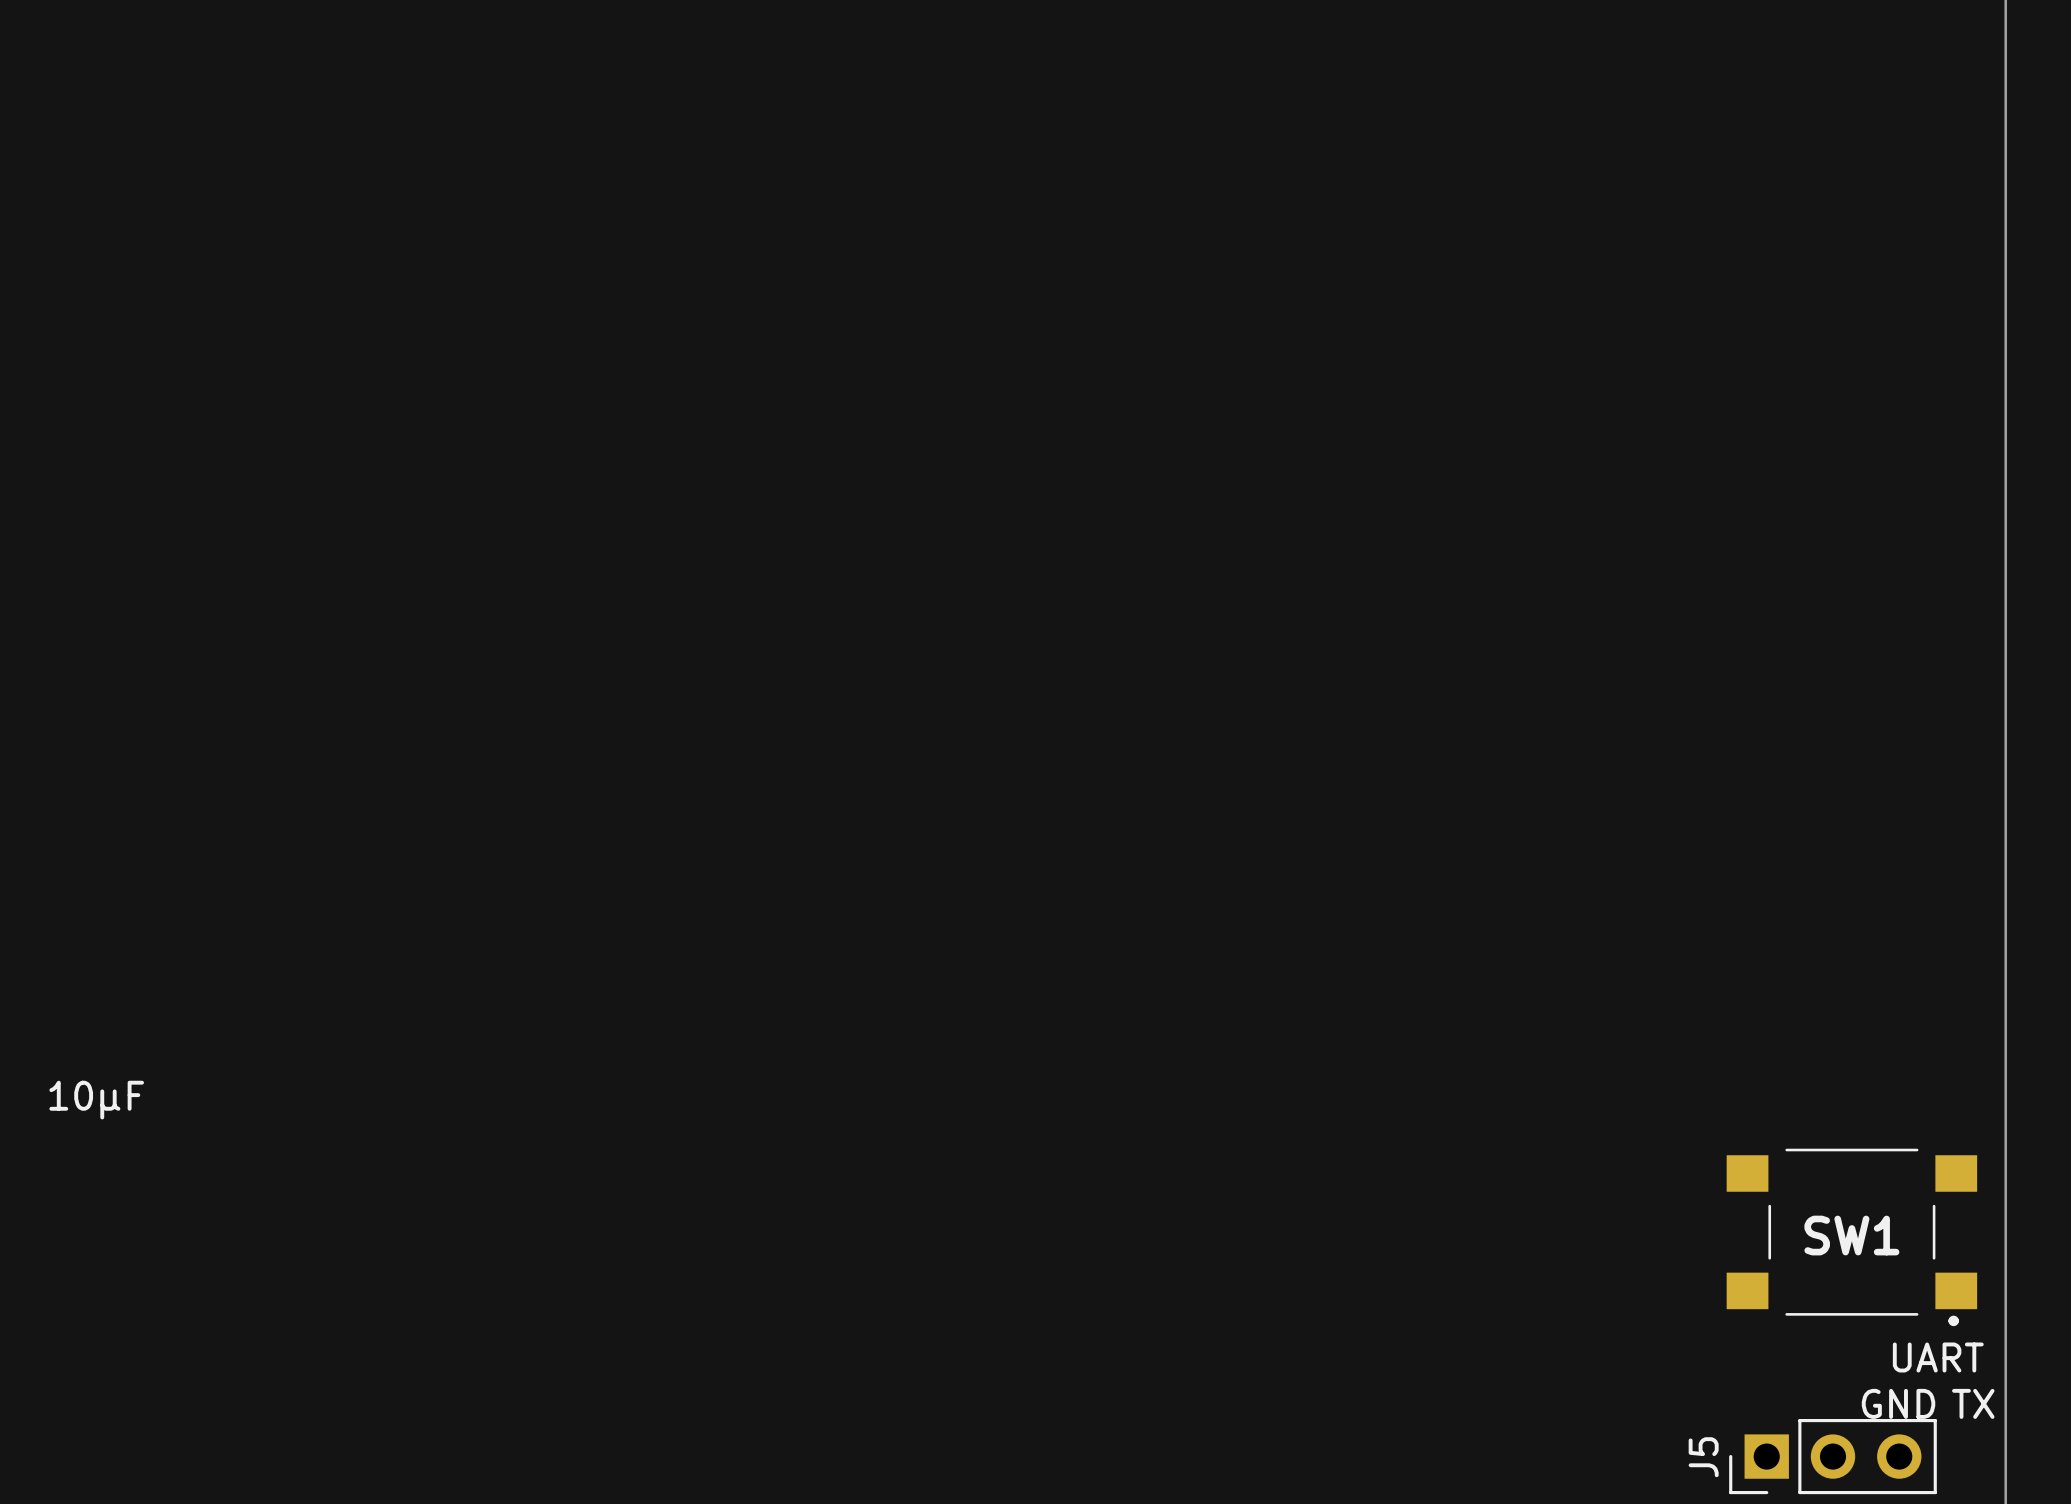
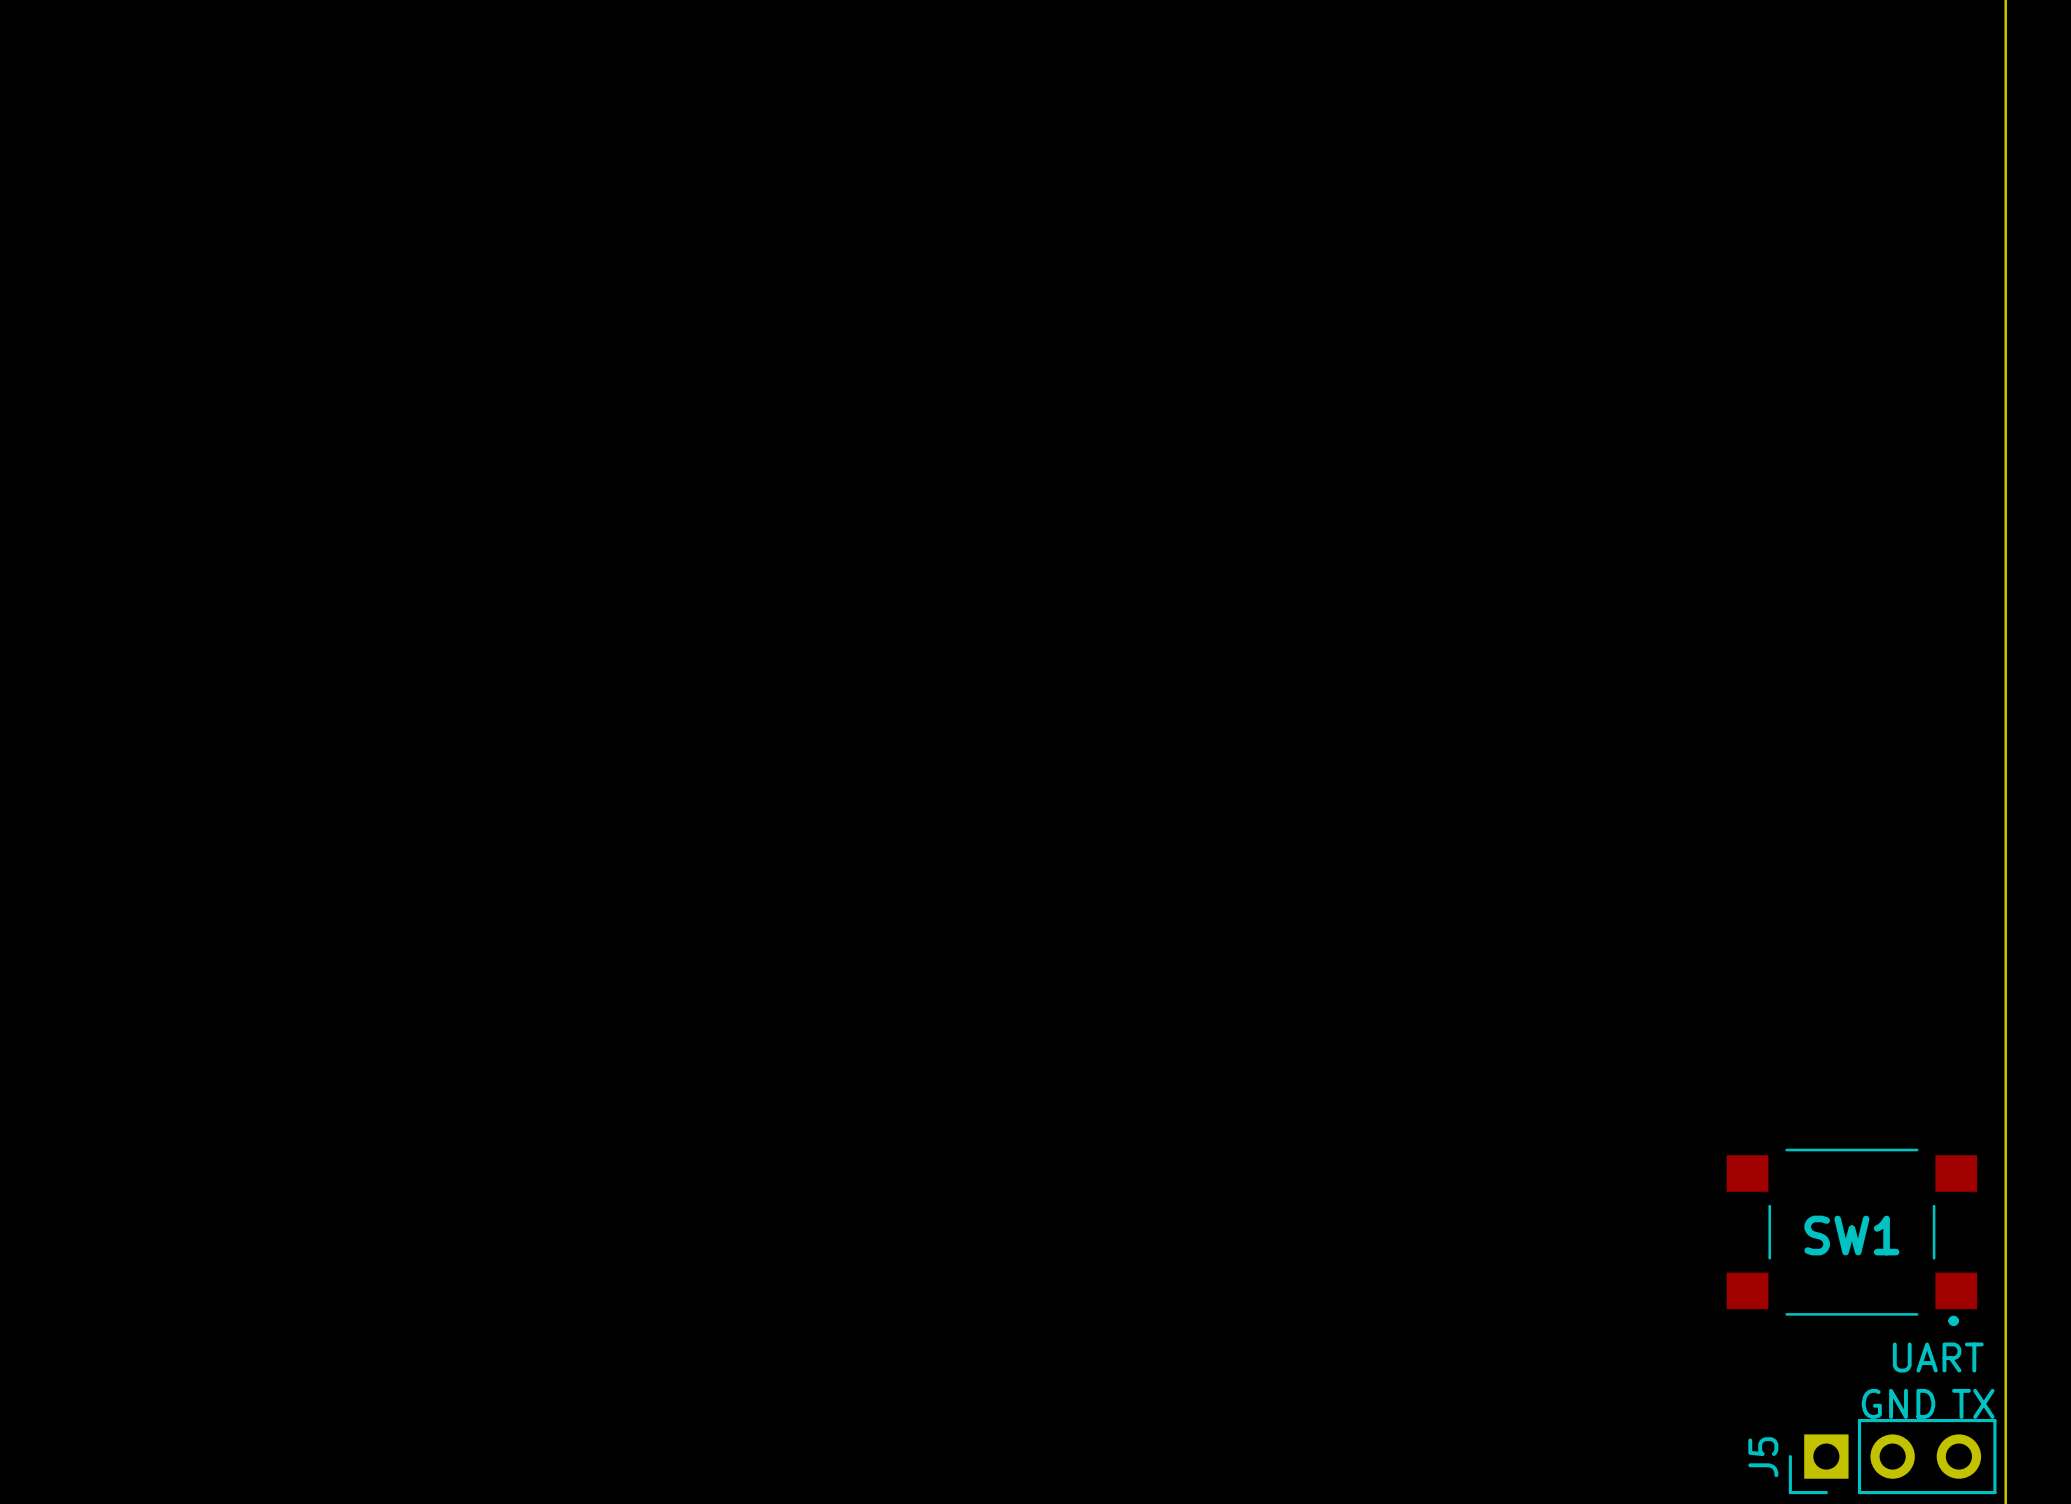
text: 10µF (96, 1100) -> none
J5 position: (1833, 1456) -> (1892, 1456)

